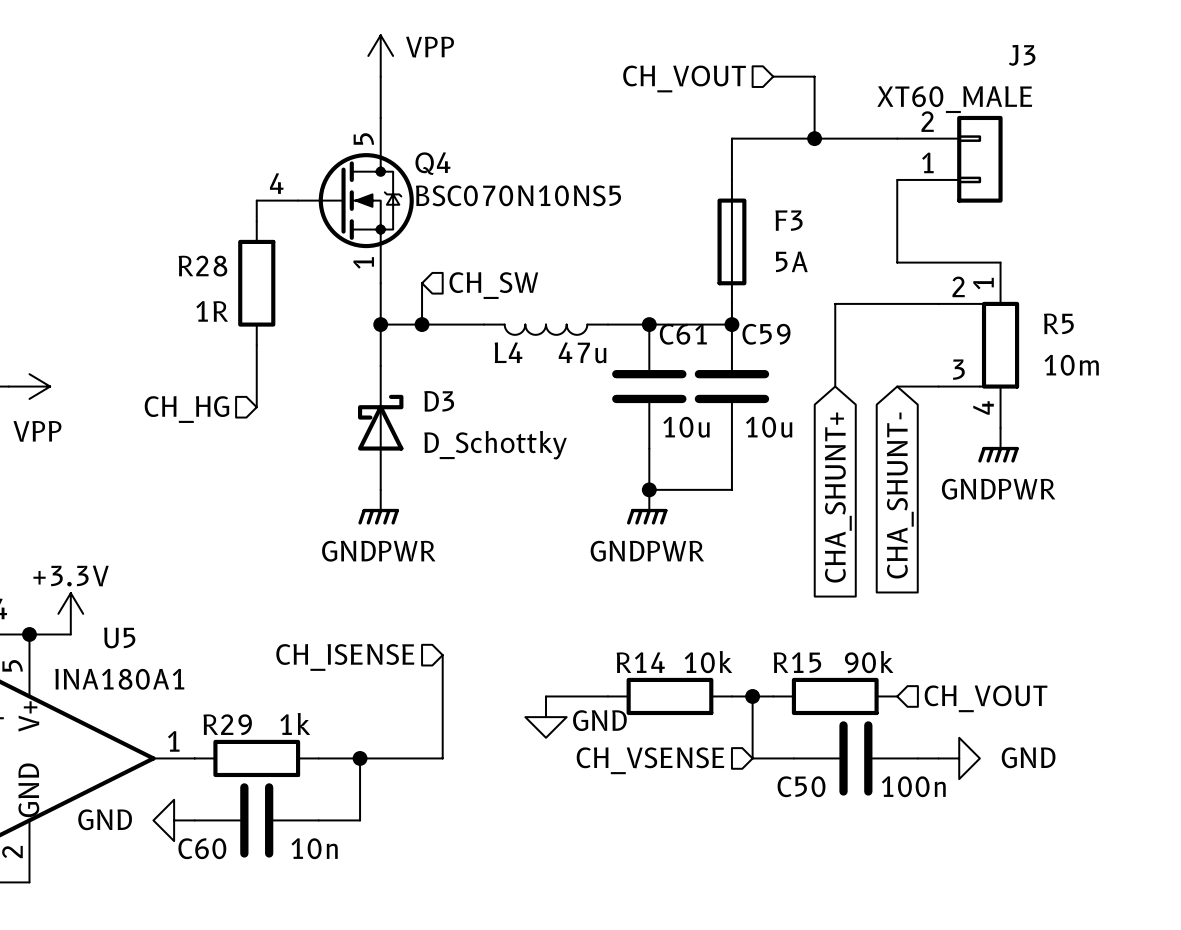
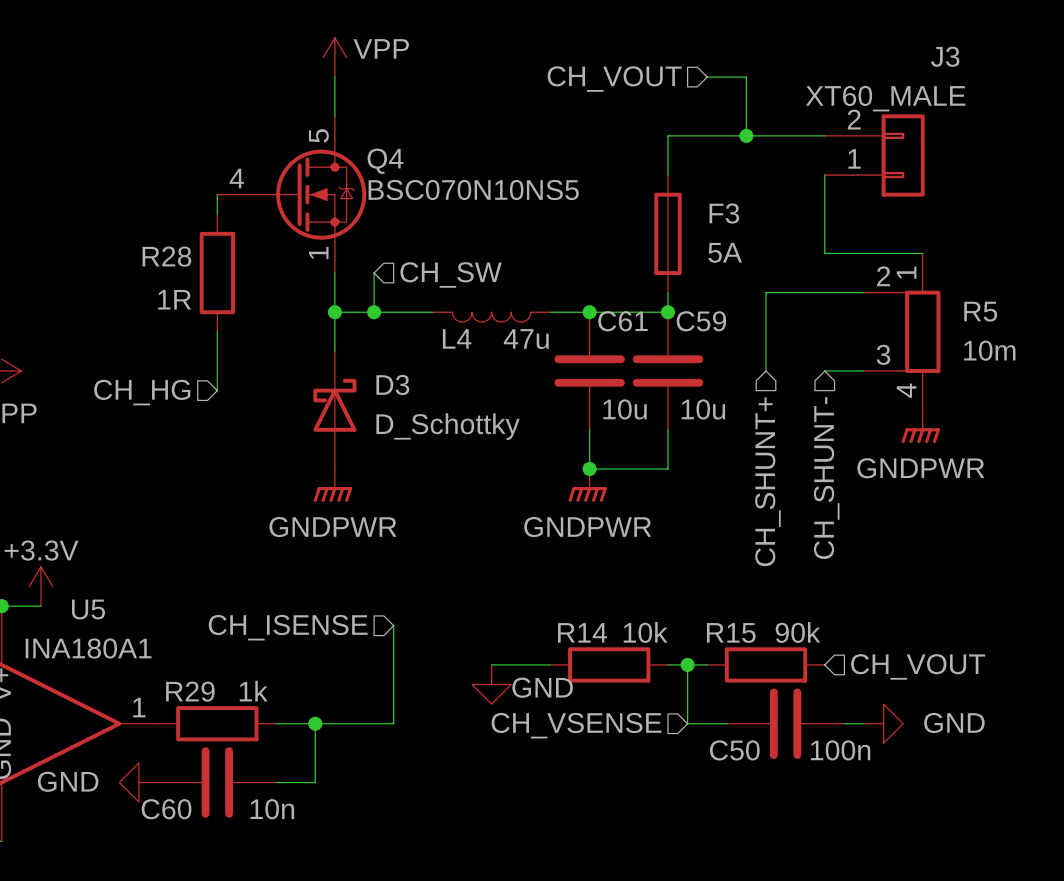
hierarchical label: none -> CH_SHUNT- (826, 478)
hierarchical label: none -> CH_SHUNT+ (767, 481)
global label: CHA_SHUNT- (900, 495) -> none
global label: CHA_SHUNT+ (838, 497) -> none

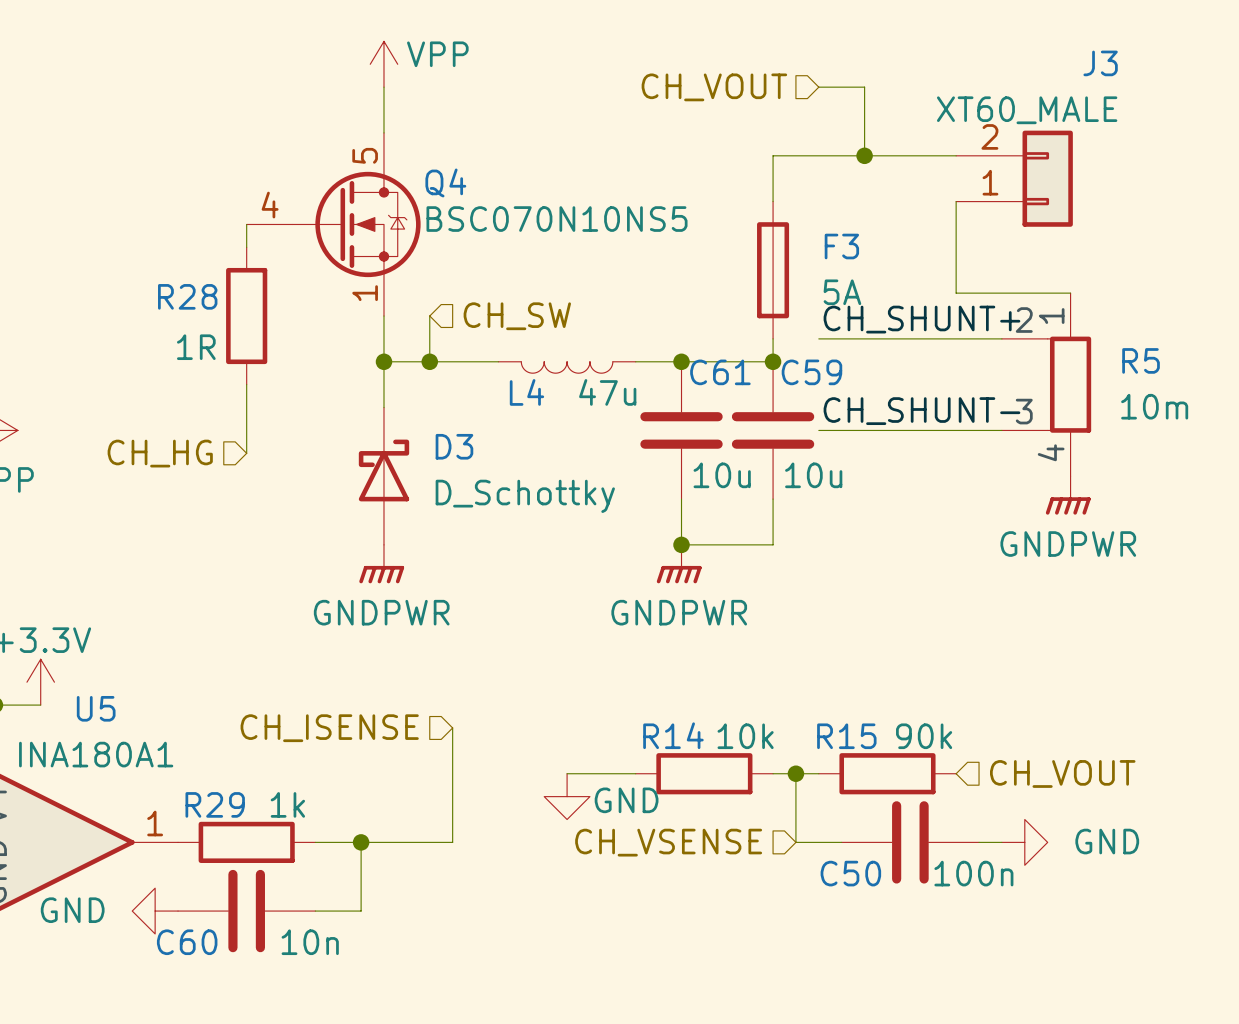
label: none -> CH_SHUNT+ (921, 319)
wire: (765, 292) (765, 371) -> (887, 338) (818, 338)
label: none -> CH_SHUNT- (921, 411)
wire: none -> (818, 430) (956, 430)
hierarchical label: CH_SHUNT- (826, 478) -> none
hierarchical label: CH_SHUNT+ (767, 481) -> none

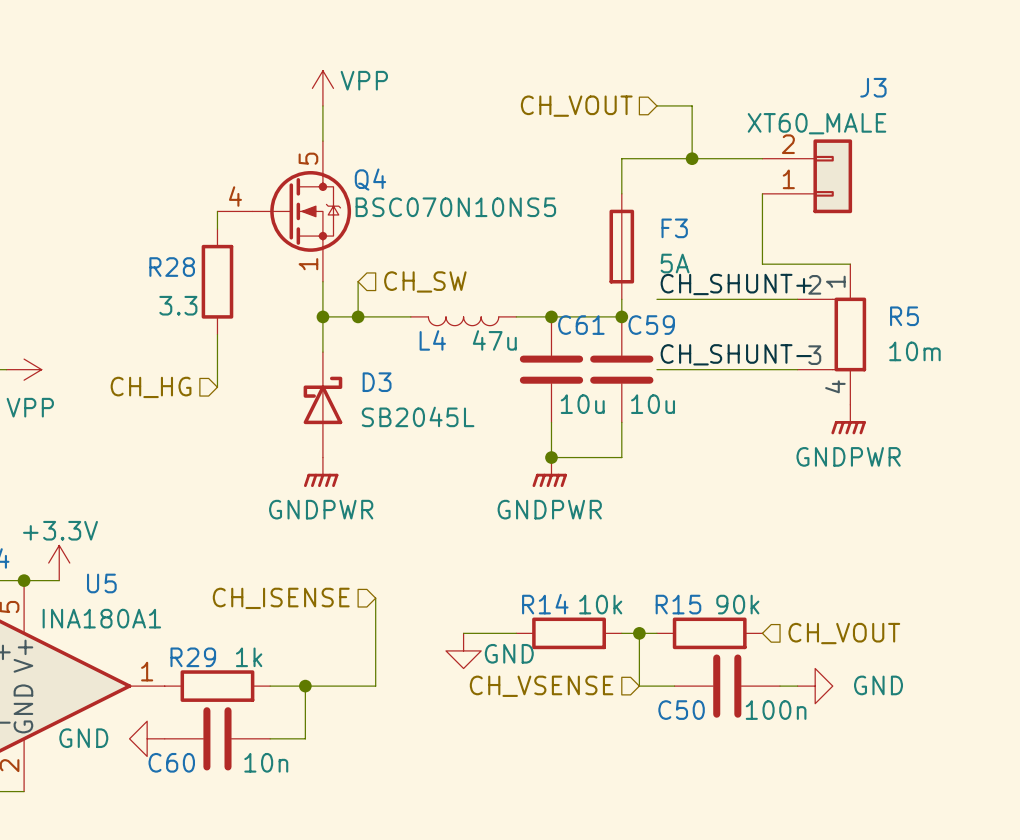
R28 value: 1R (196, 347) -> 3.3 (178, 305)
D3 value: D_Schottky (525, 496) -> SB2045L (418, 416)

